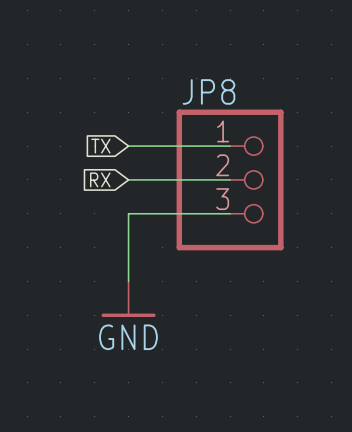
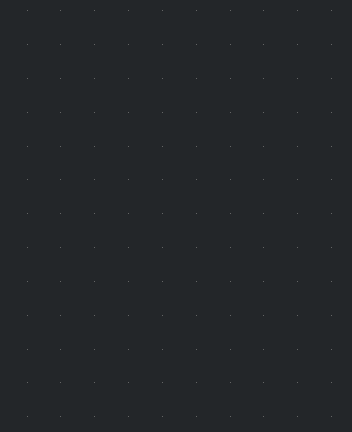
global label: TX (100, 146) -> none
wire: (128, 146) (230, 146) -> none
global label: RX (100, 179) -> none
wire: (128, 179) (230, 179) -> none
JP8: (230, 179) -> none
wire: (230, 213) (128, 213) (128, 281) -> none
power symbol: GND (128, 299) -> none

